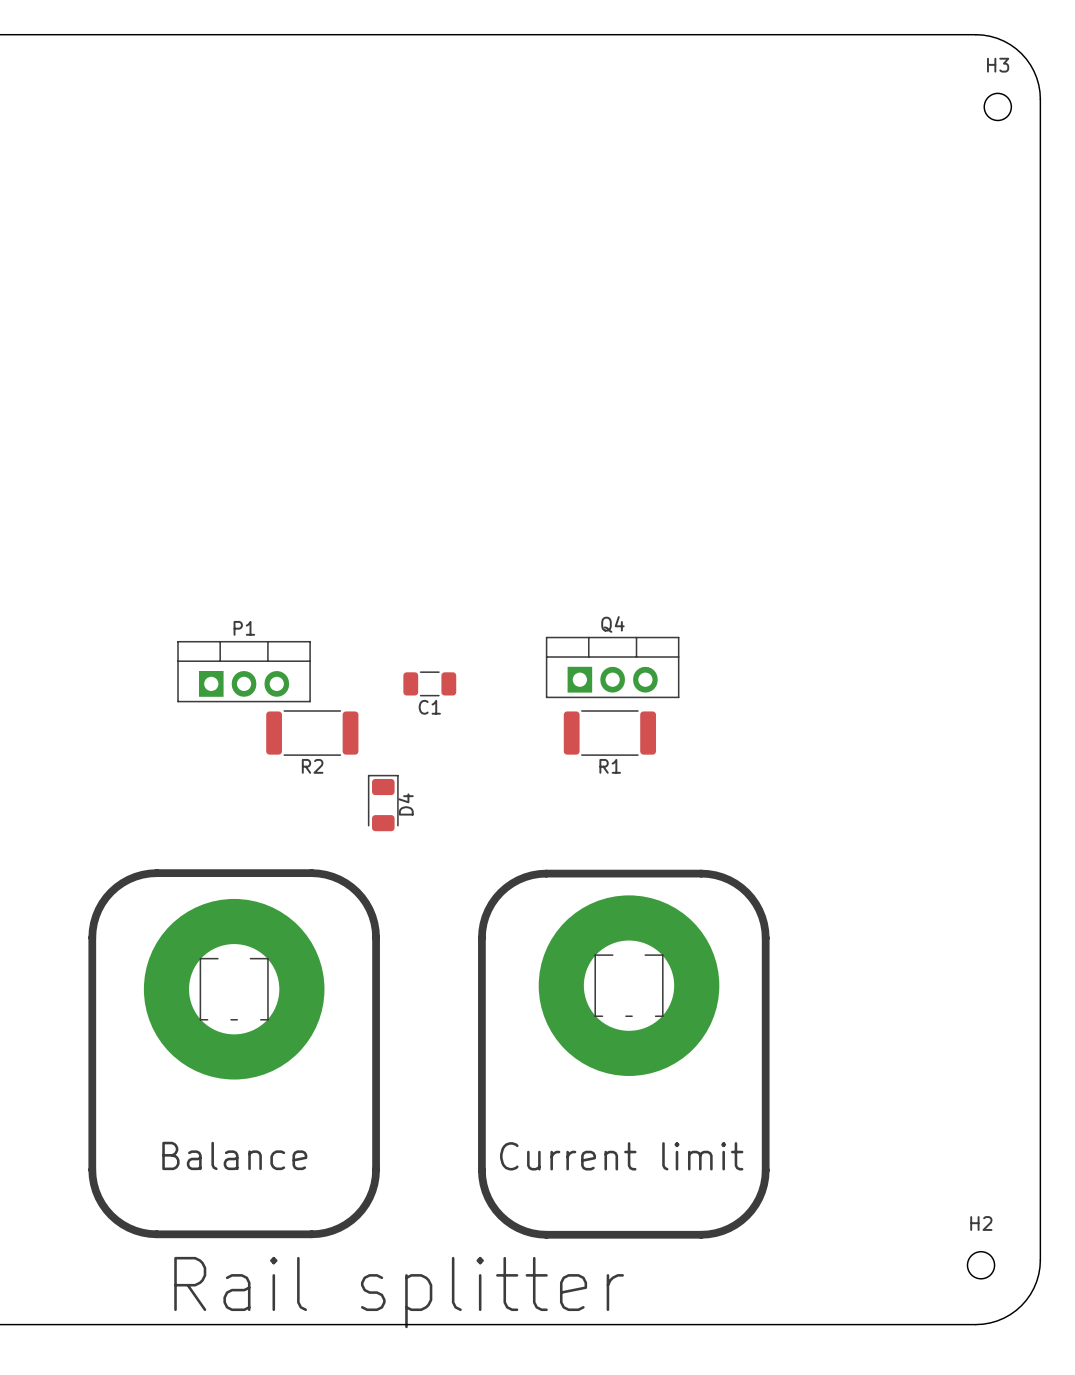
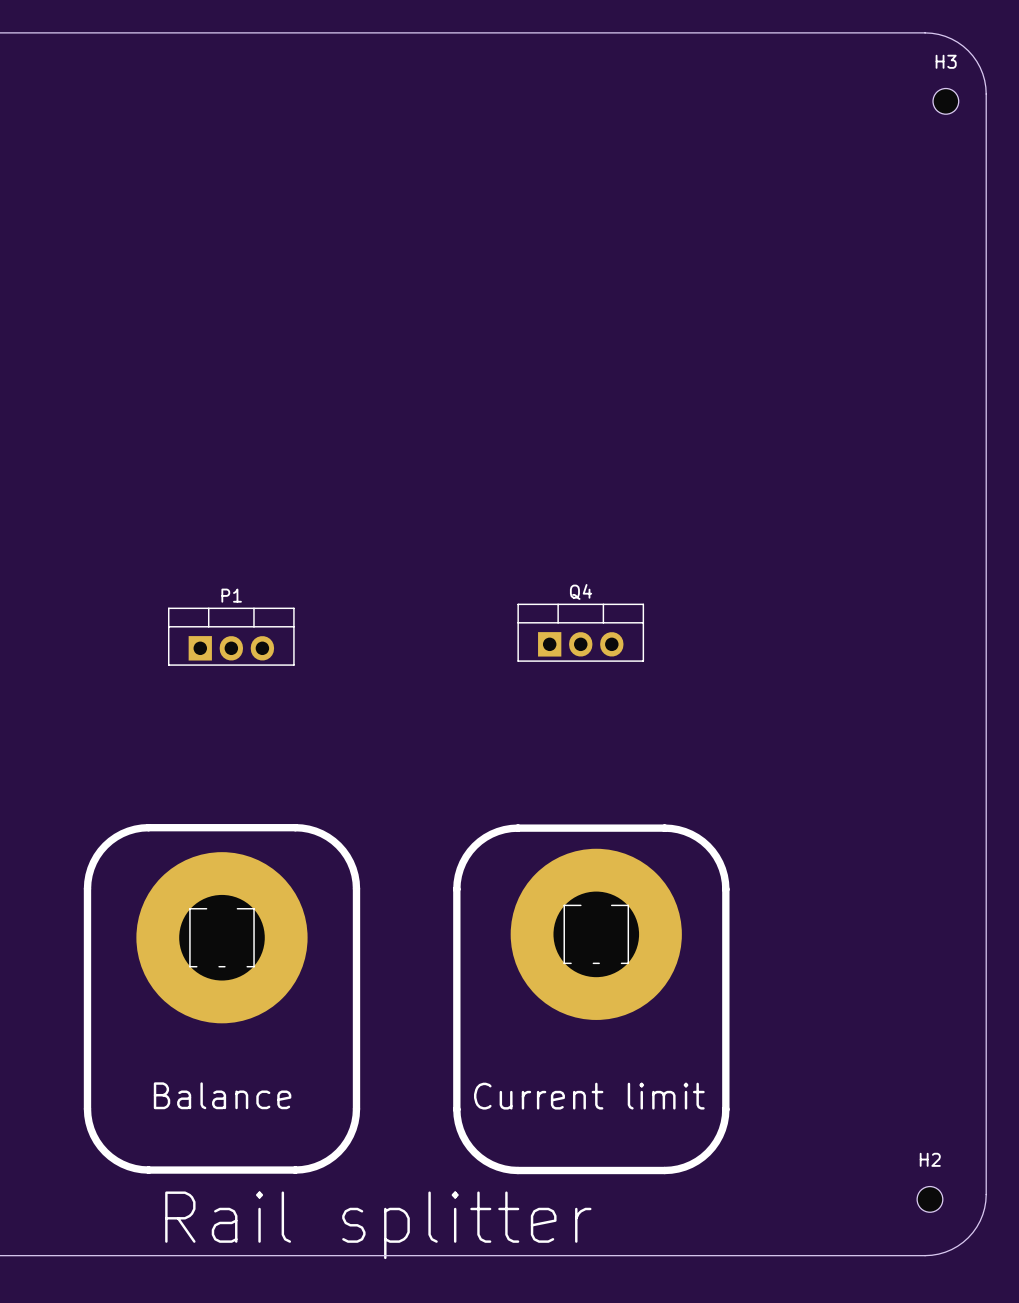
C1: (429, 683) -> none
R2: (312, 733) -> none
R1: (609, 733) -> none
D4: (383, 803) -> none

